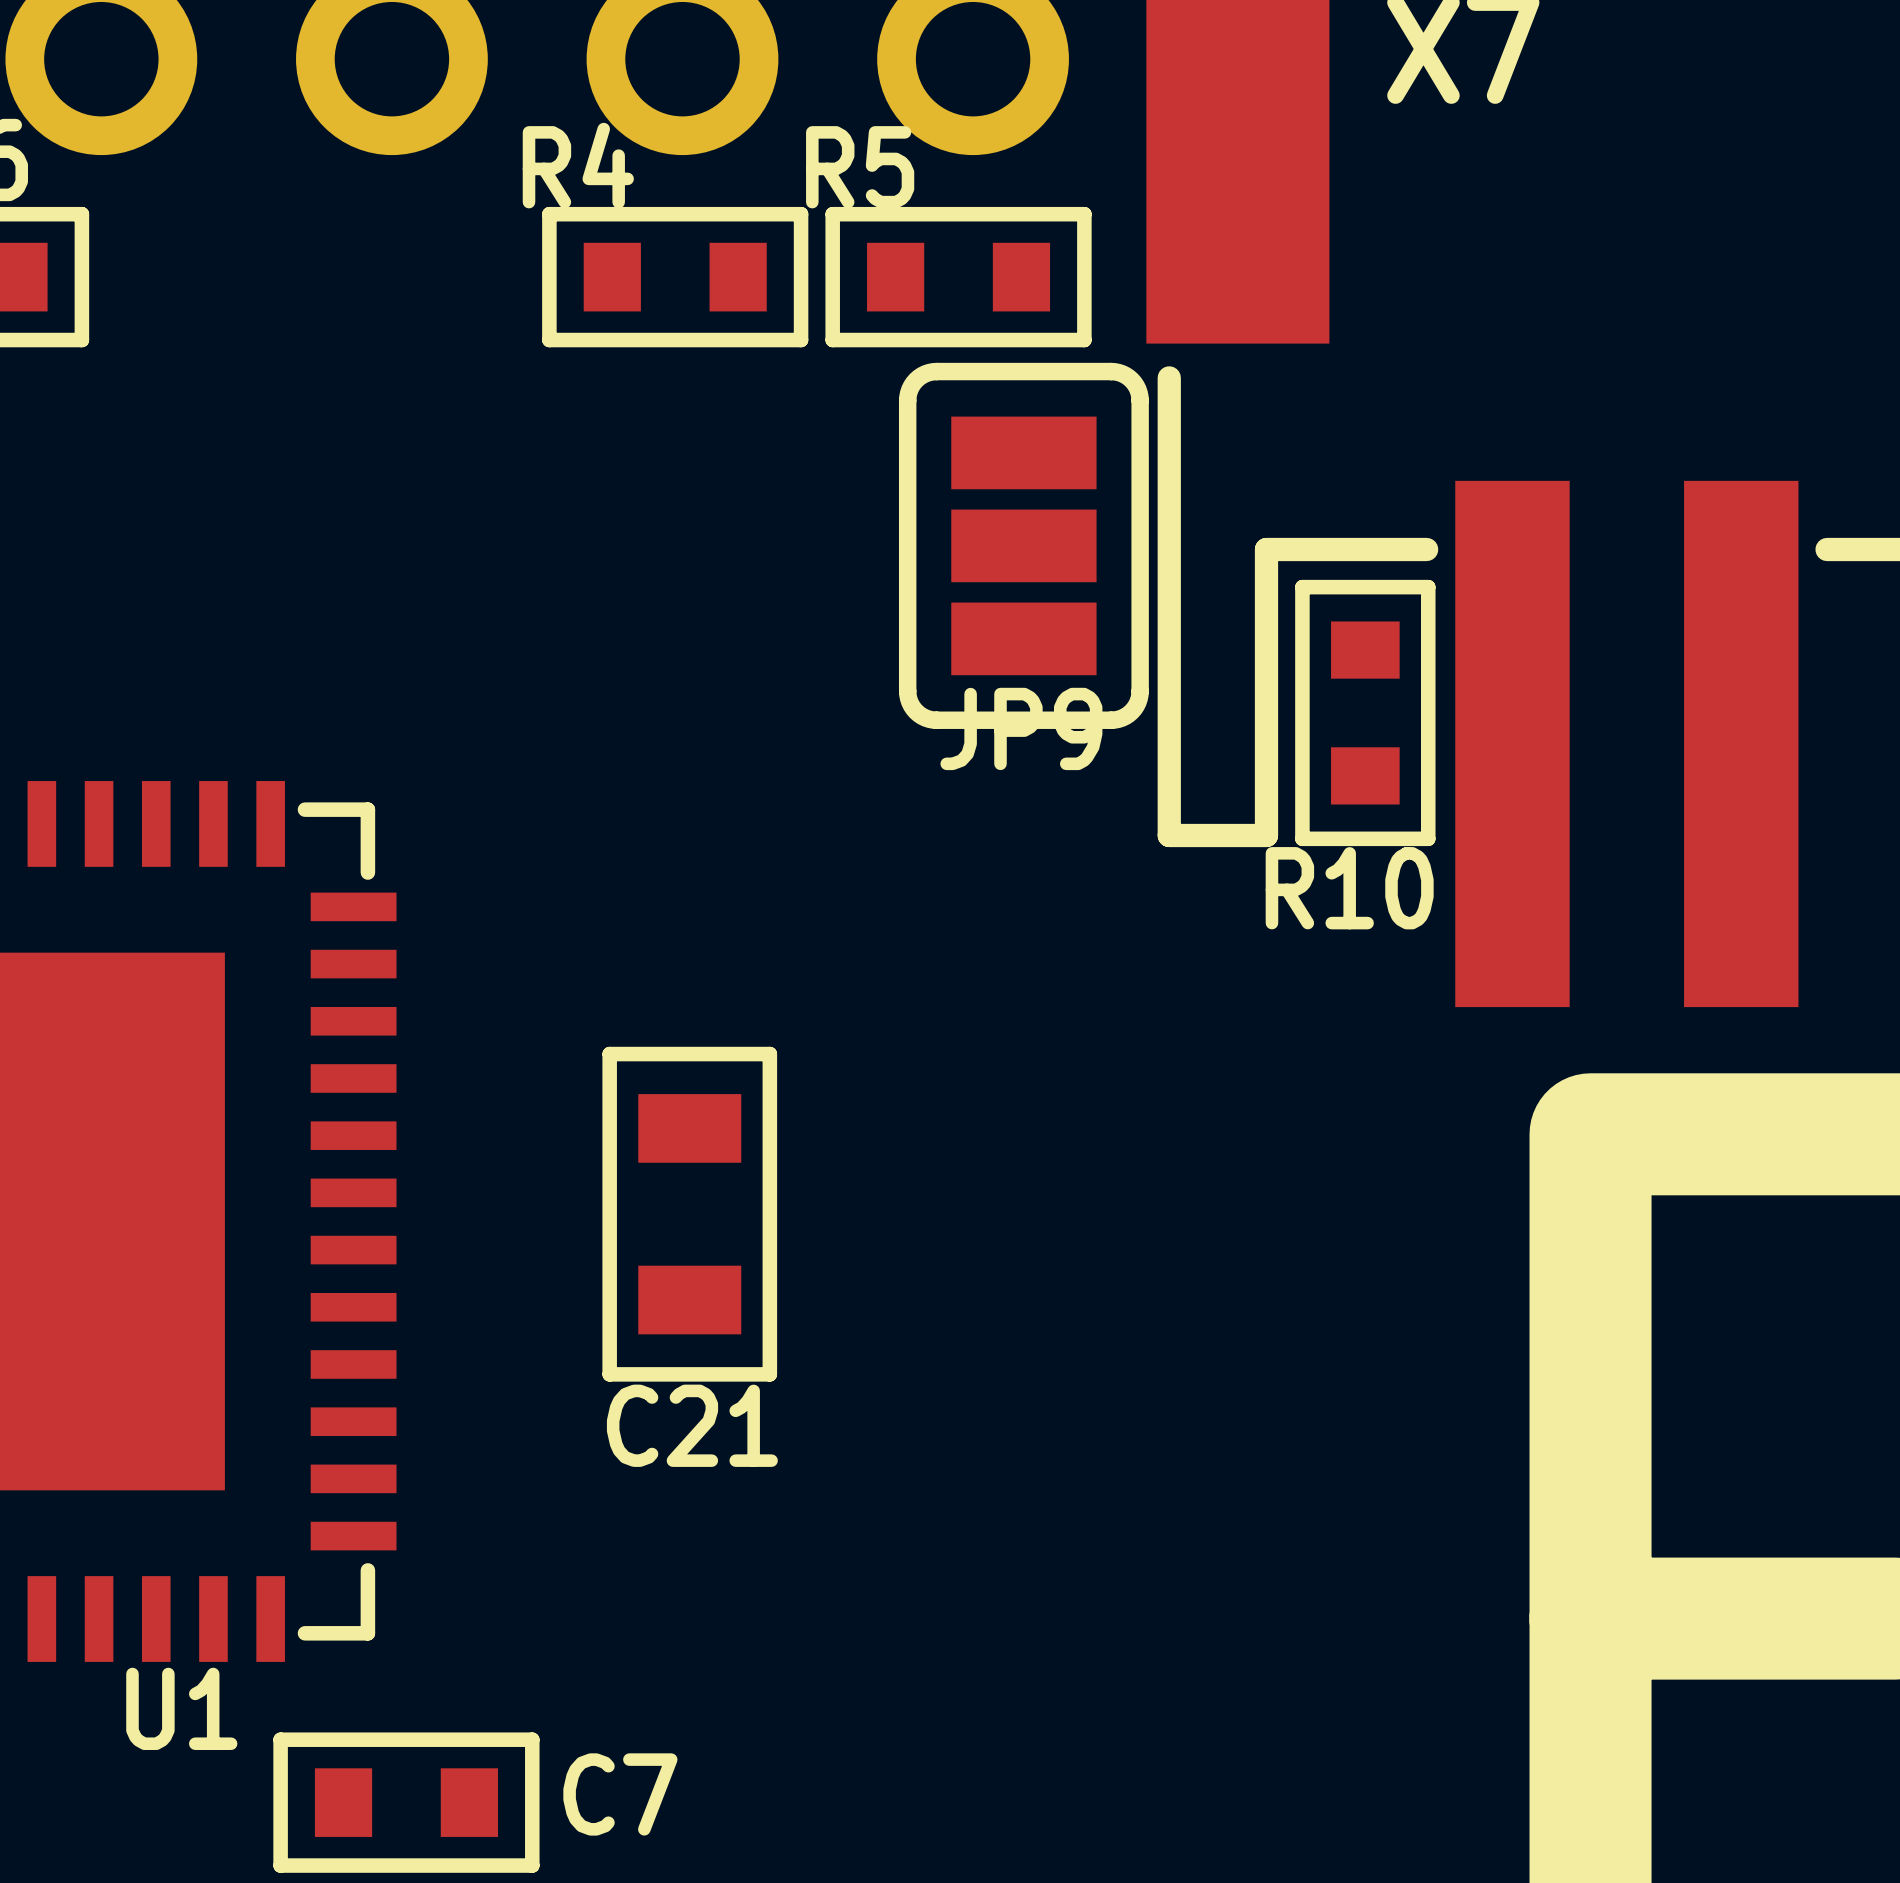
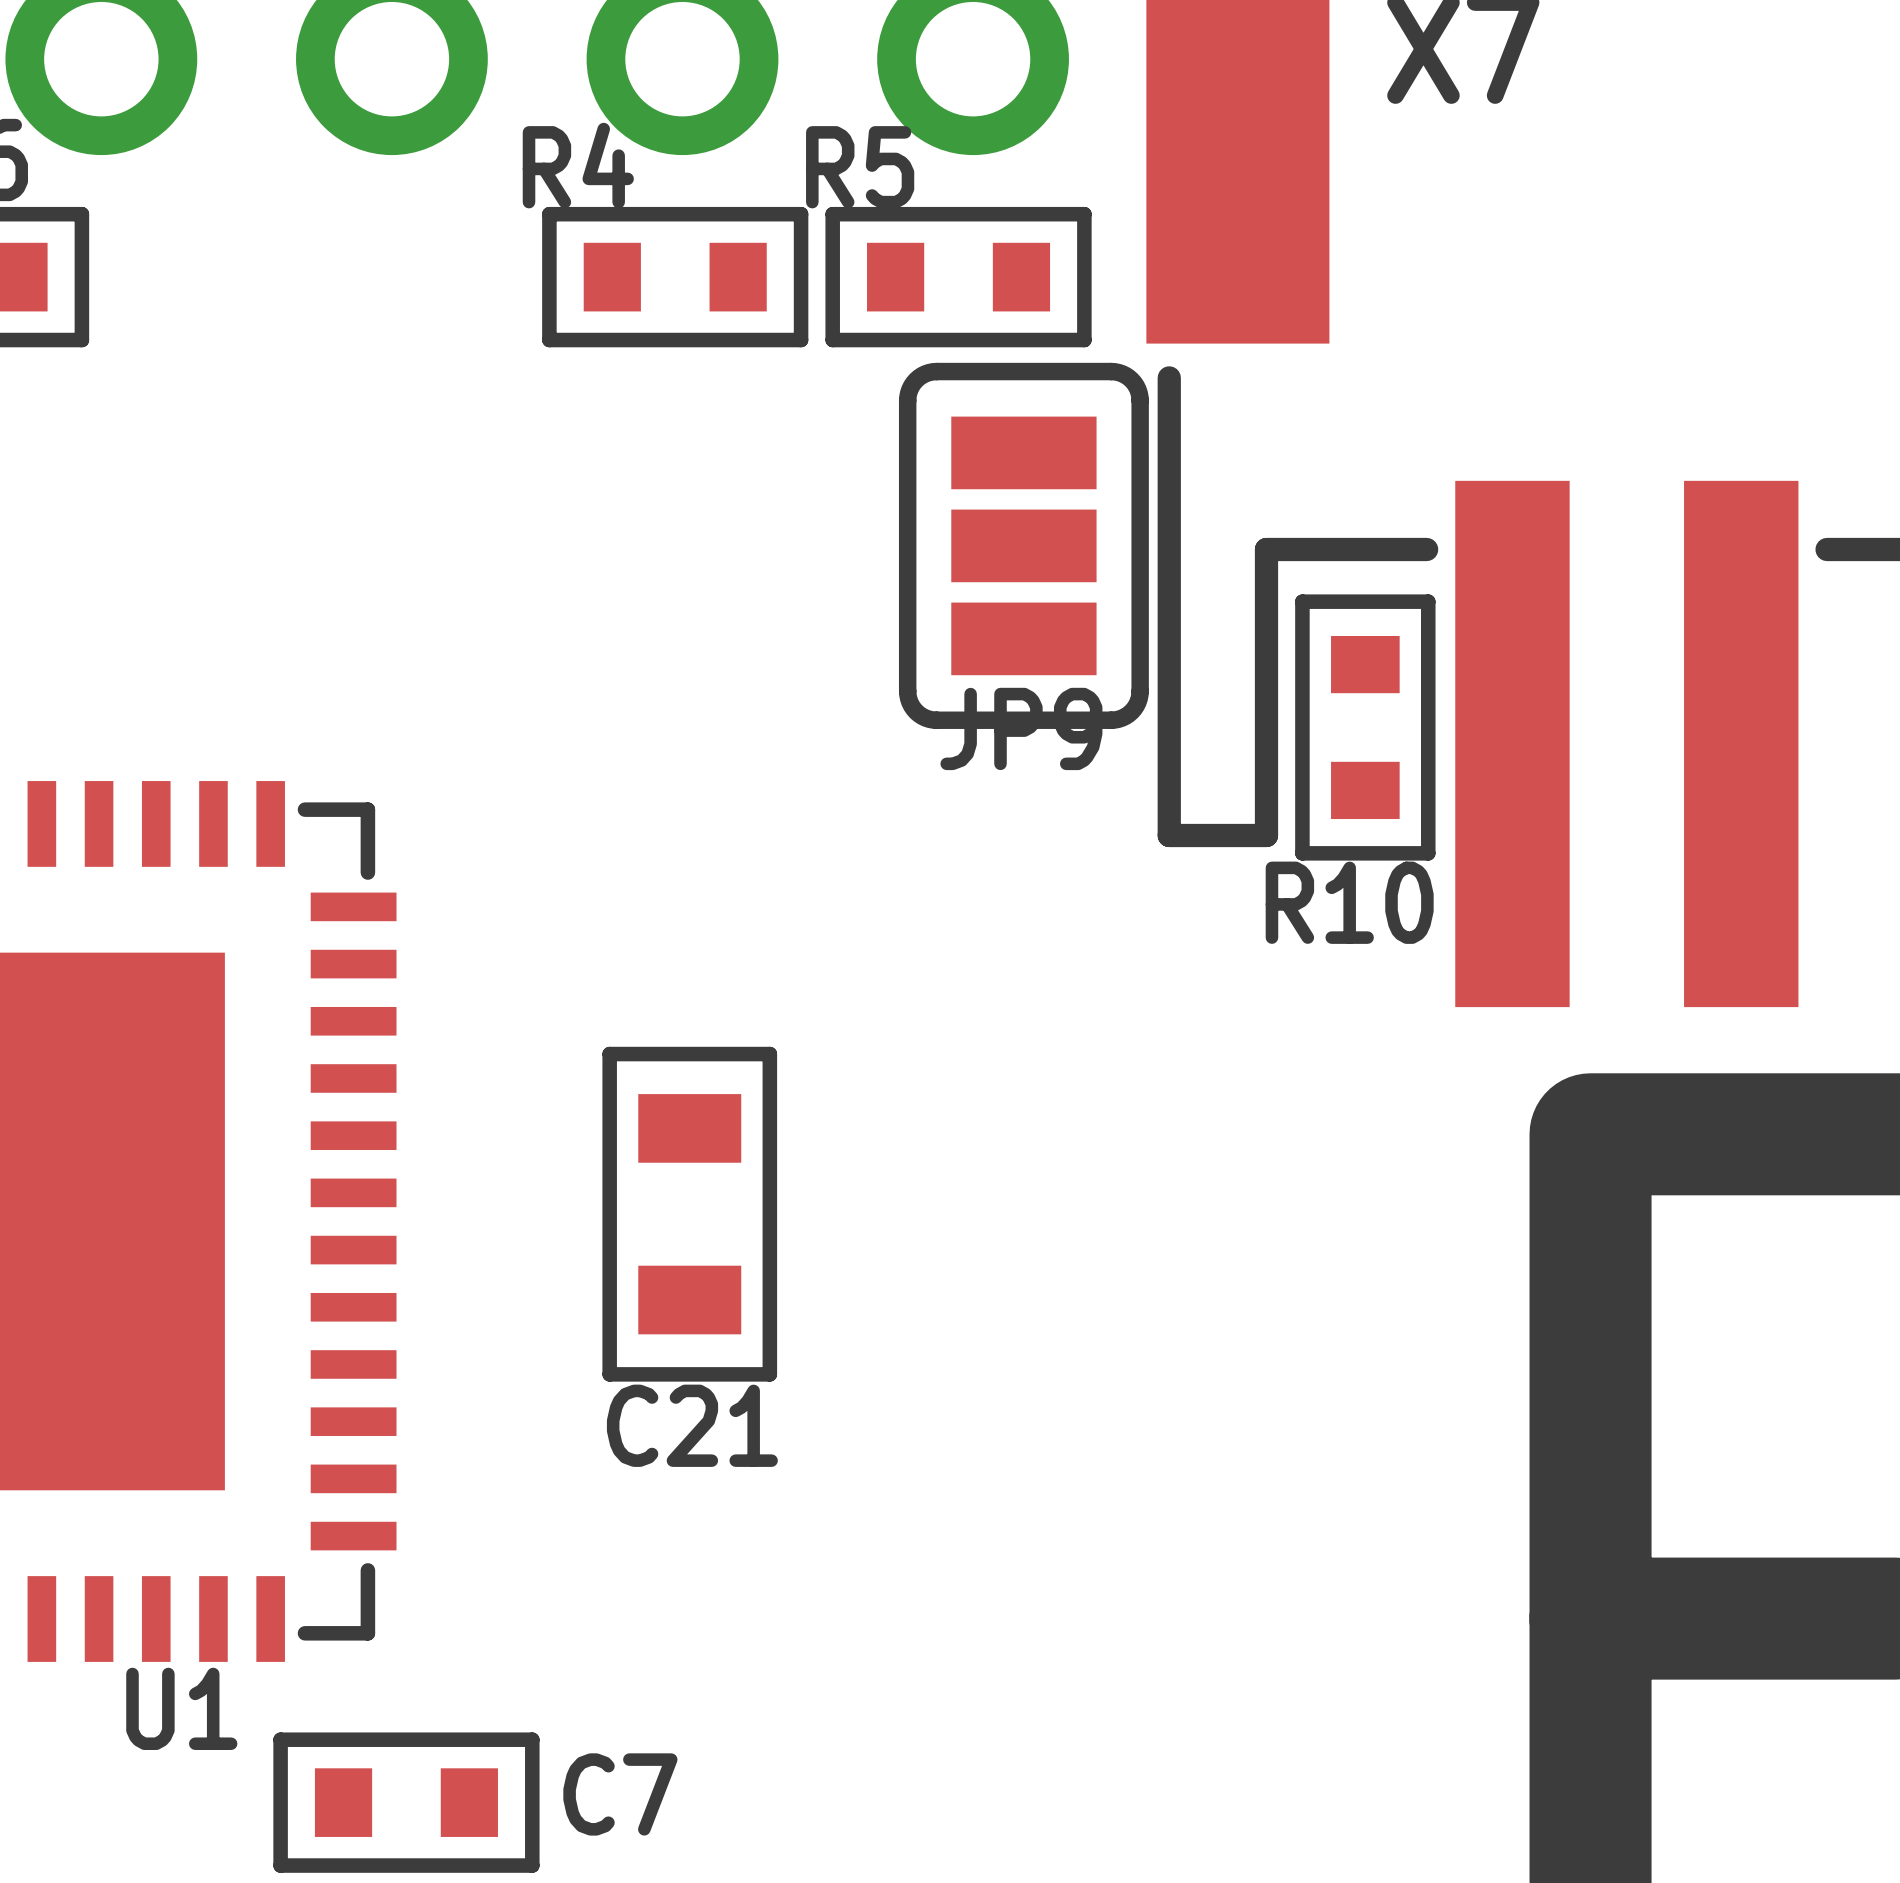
R10 position: (1365, 712) -> (1365, 727)

